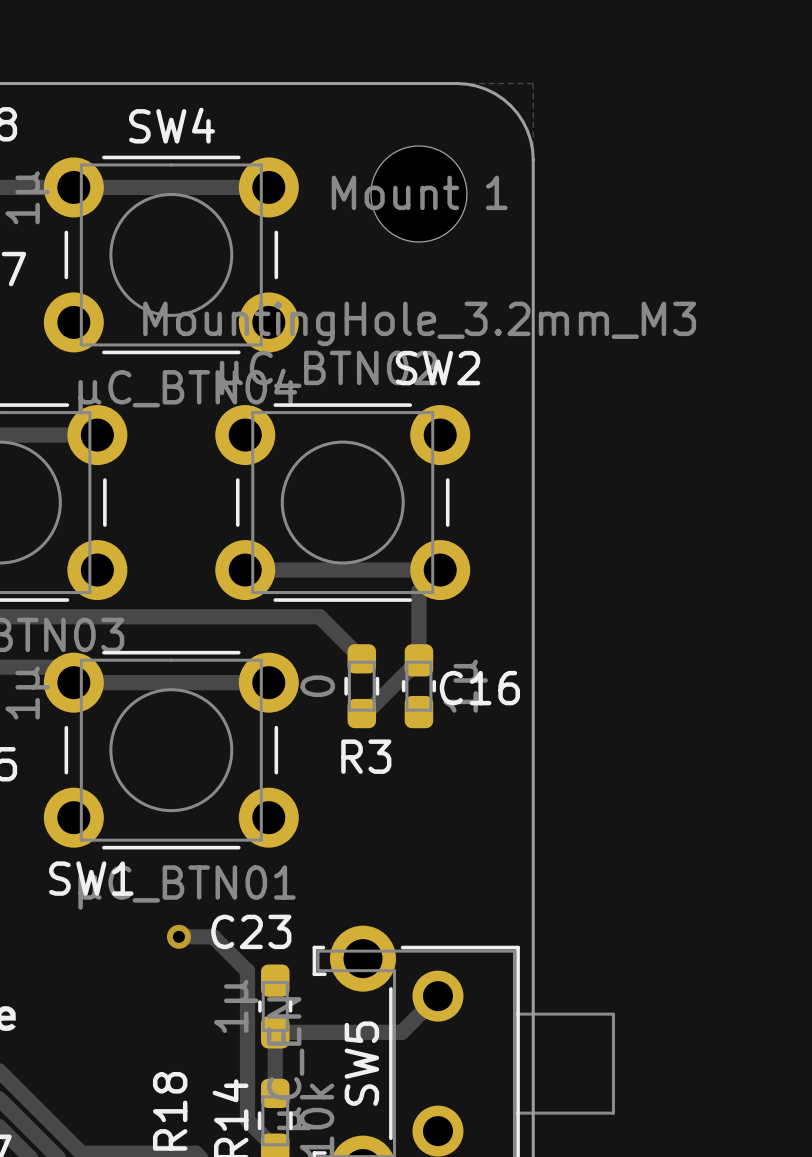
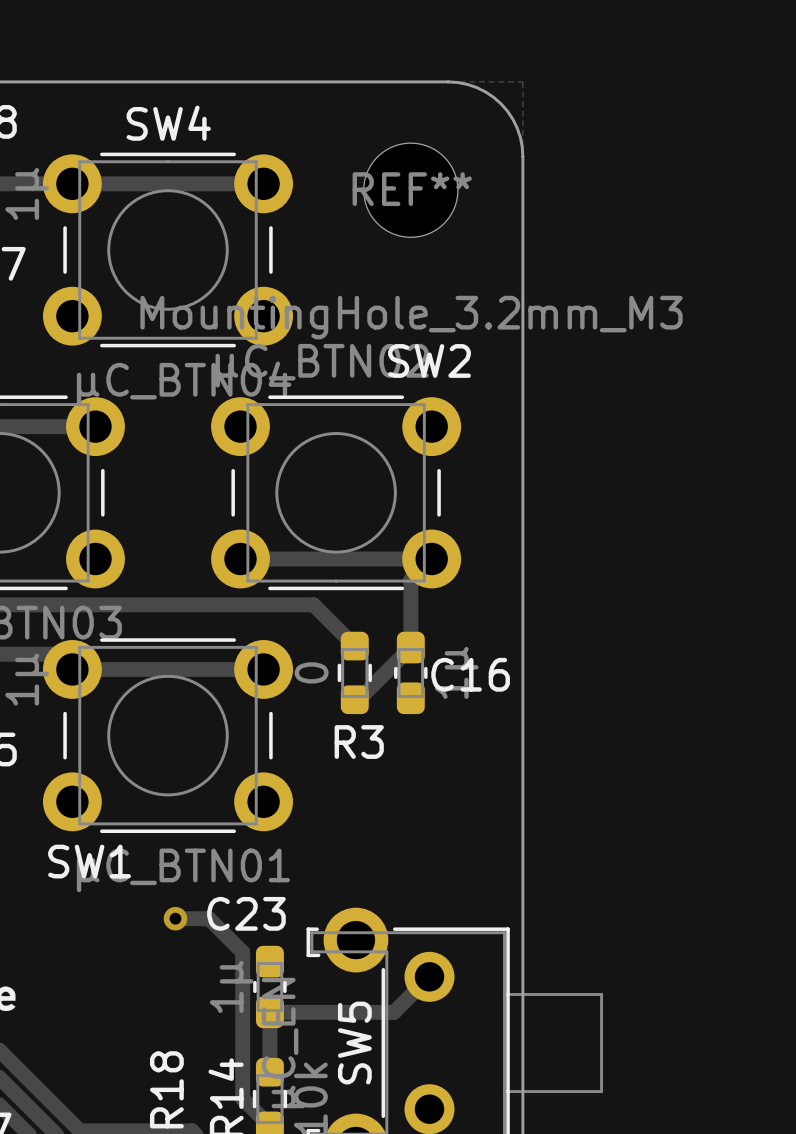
Mount 1 name: Mount 1 (419, 192) -> REF** (412, 189)

